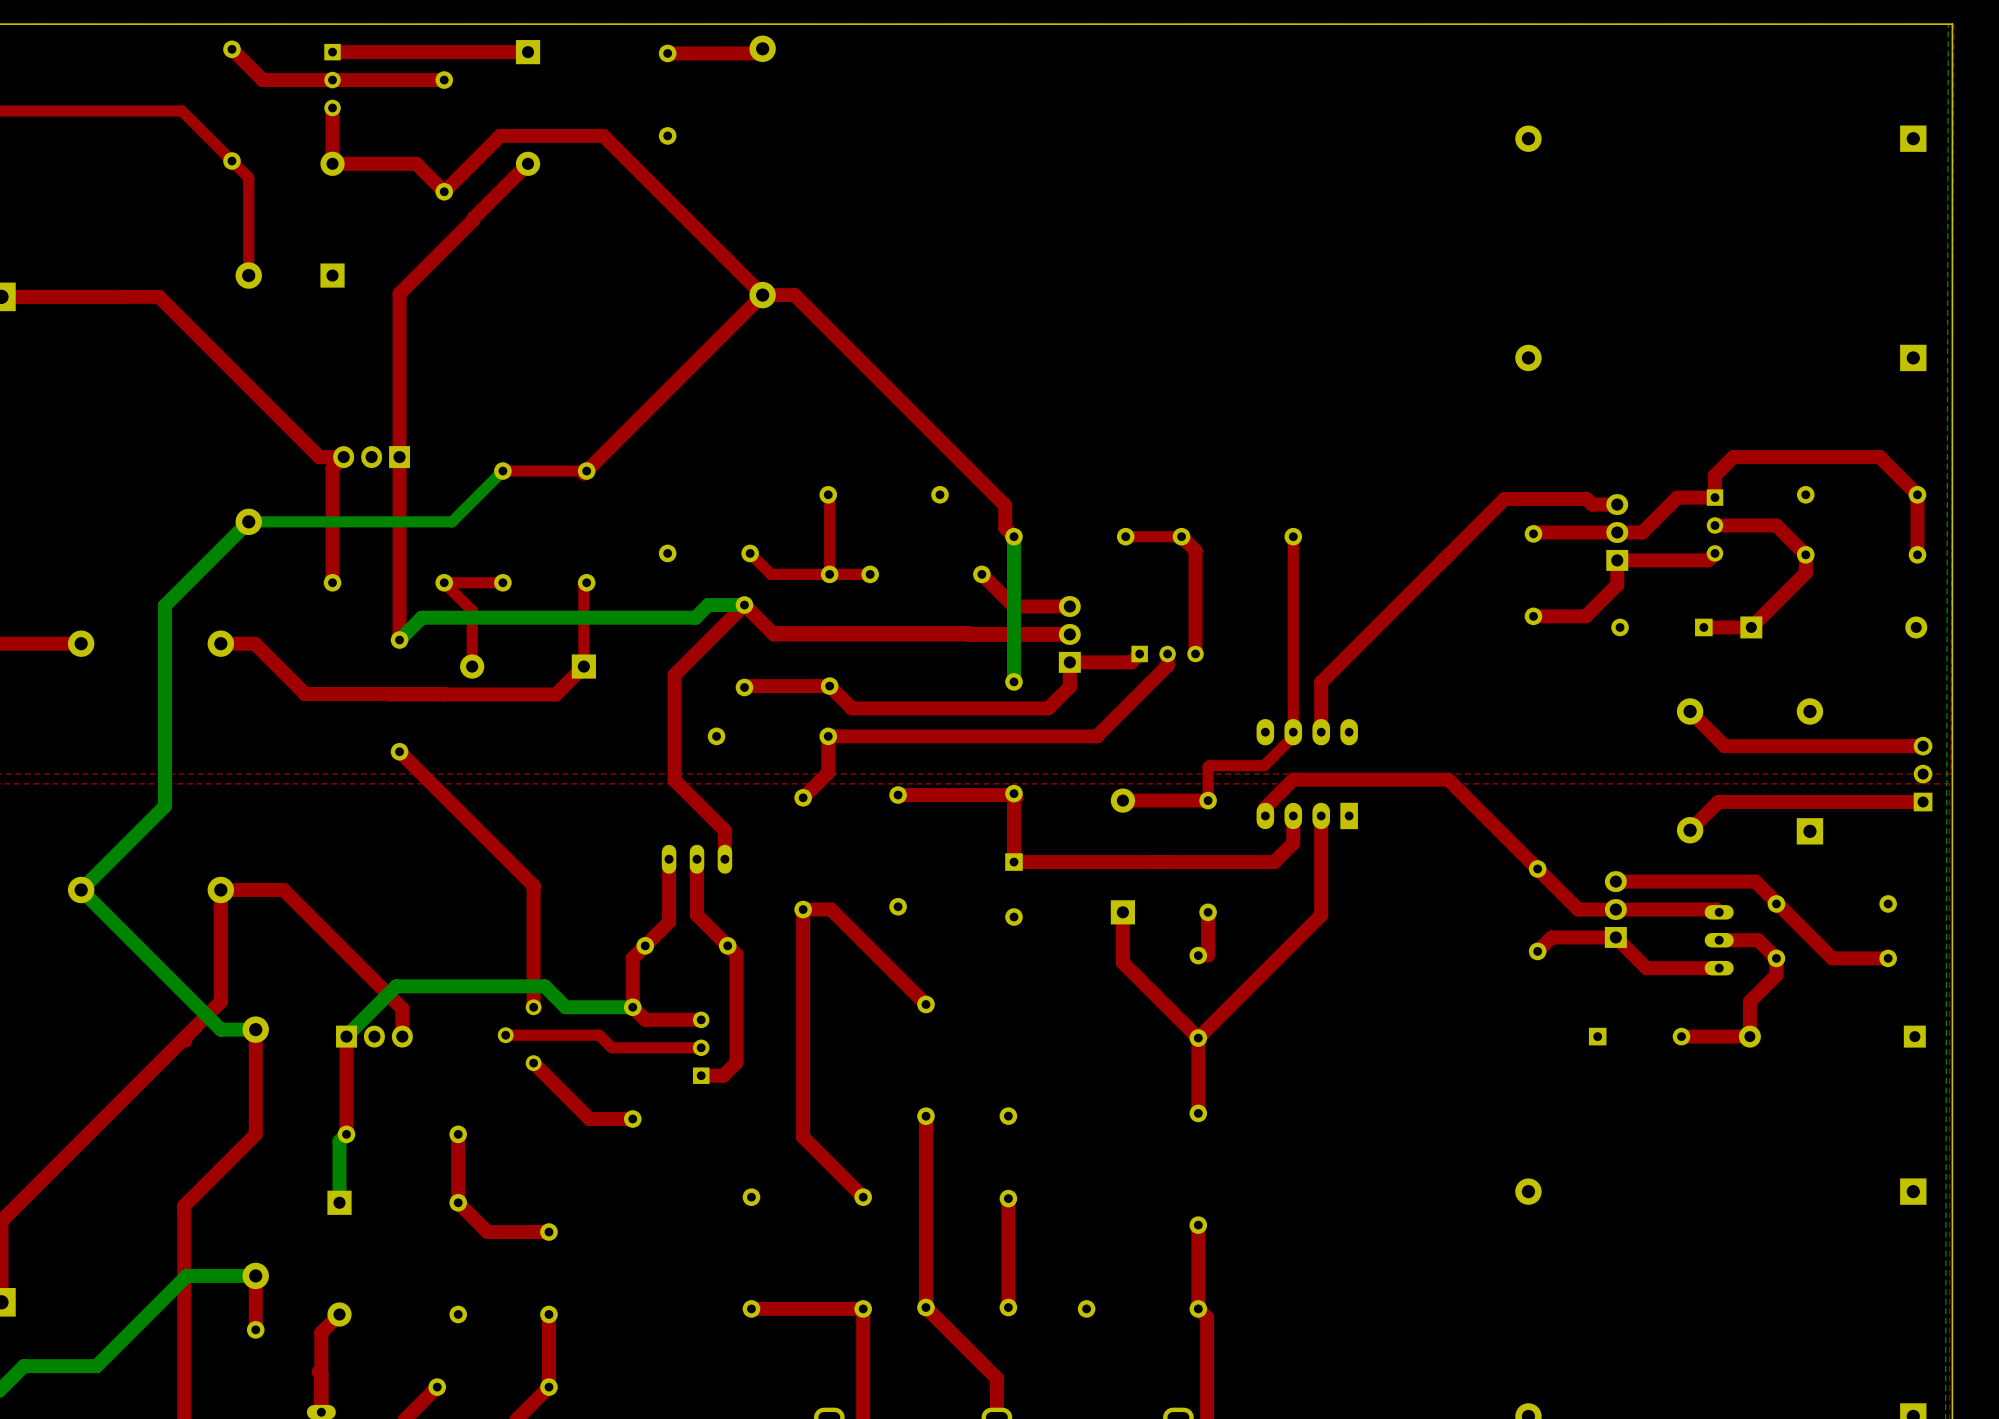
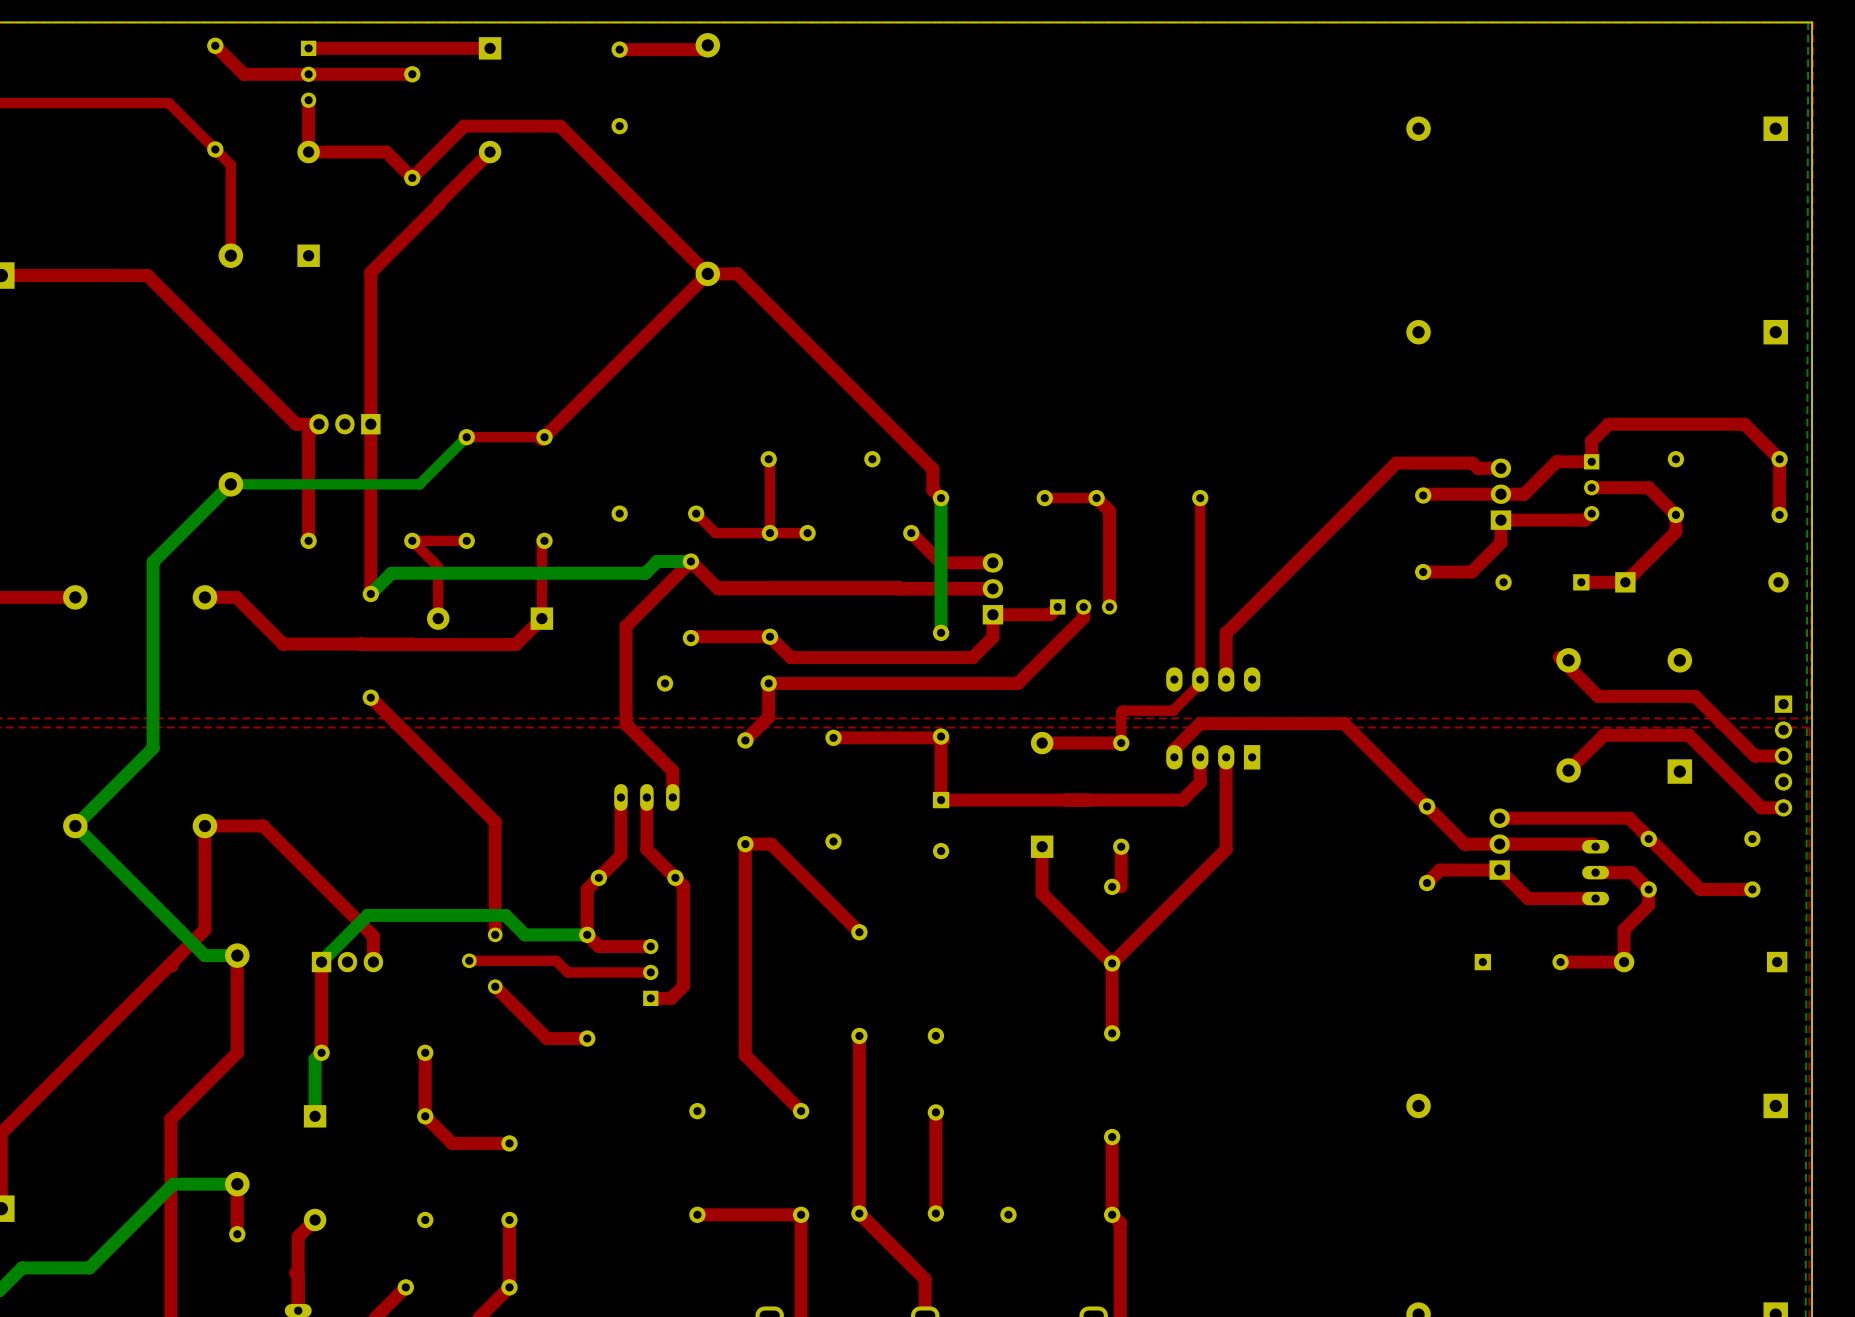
top track: none -> (1559, 657) (1598, 696) (1695, 696) (1755, 756) (1783, 756)
top track: (1690, 711) (1724, 746) (1923, 746) -> none
part: (1923, 774) -> none
top track: (1923, 802) (1718, 802) -> (1783, 807) (1761, 807) (1688, 735) (1603, 735) (1594, 744)
part: none -> (1783, 756)

